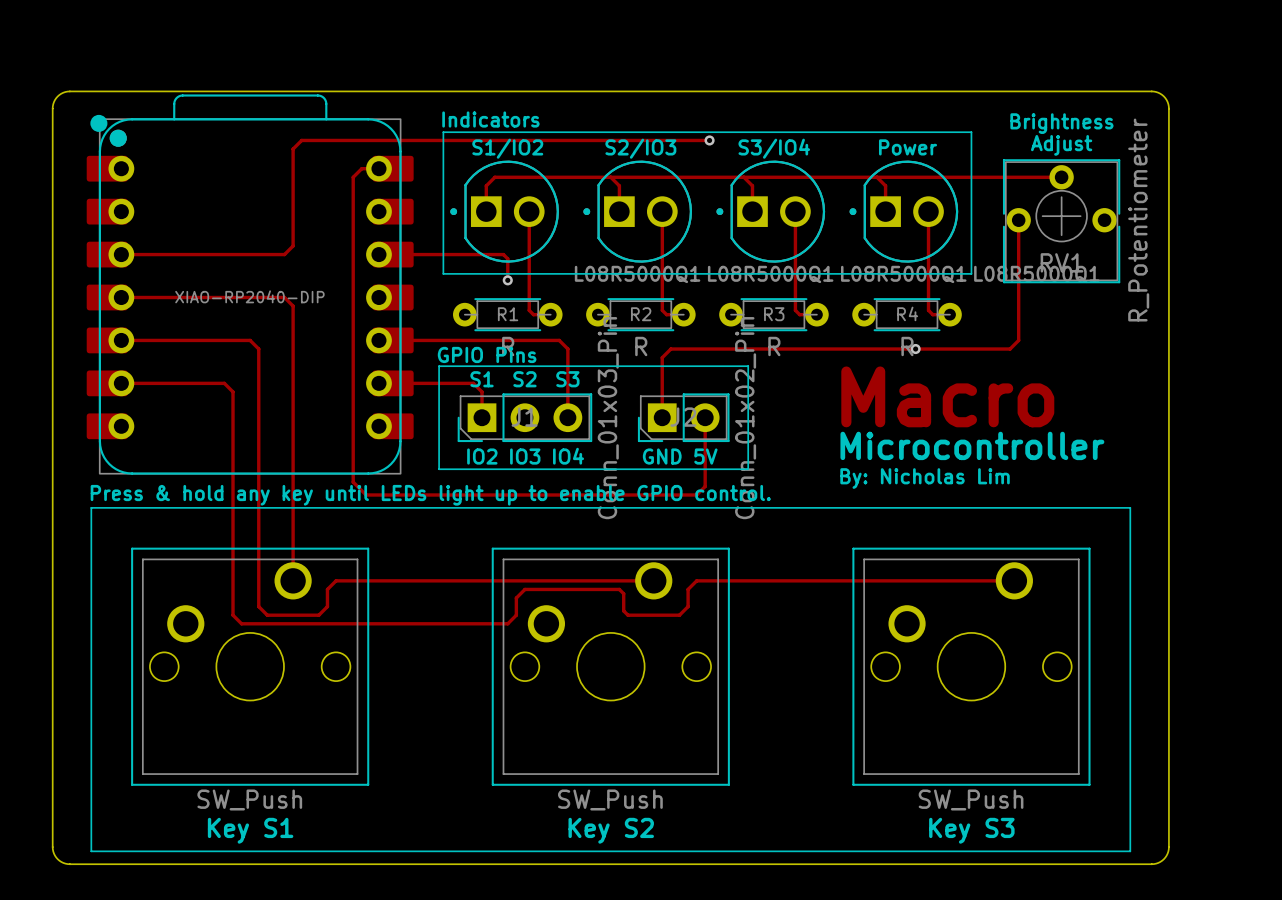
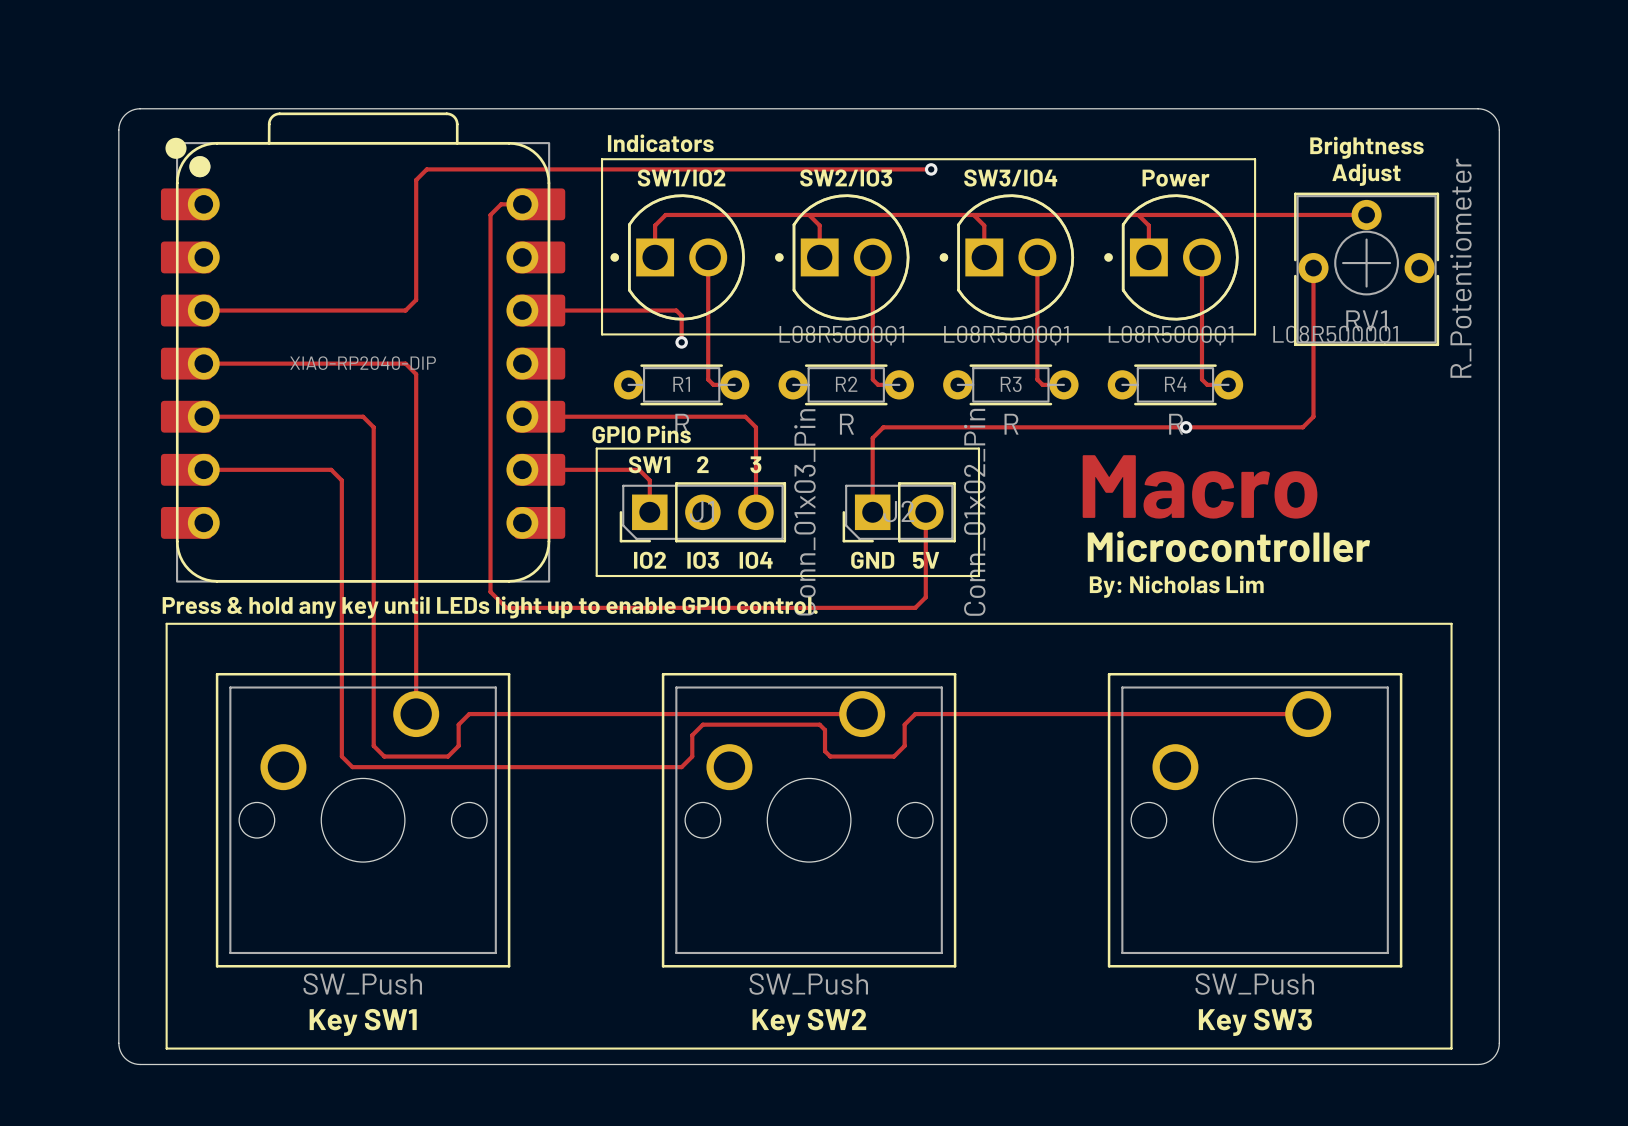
text: S1/IO2 (507, 148) -> SW1/IO2 (681, 178)
text: S2/IO3 (640, 148) -> SW2/IO3 (846, 178)
text: S3/IO4 (774, 148) -> SW3/IO4 (1010, 178)
text: S1 (482, 379) -> SW1 (649, 464)
text: S2 (524, 379) -> 2 (702, 464)
text: S3 (567, 379) -> 3 (755, 464)
text: Key S1 (250, 830) -> Key SW1 (363, 1022)
text: Key S2 (611, 830) -> Key SW2 (809, 1022)
text: Key S3 (971, 830) -> Key SW3 (1255, 1022)

